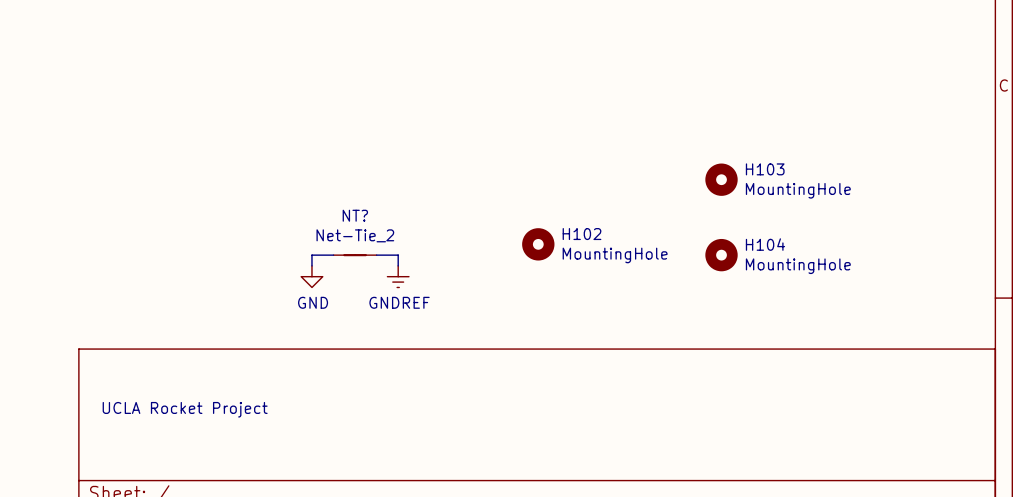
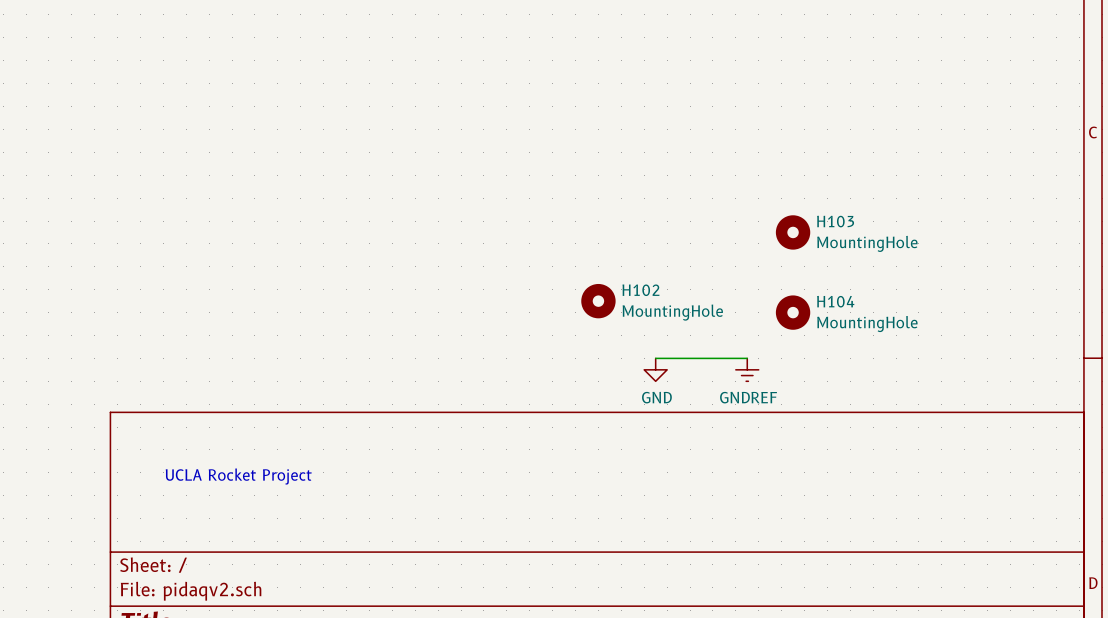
wire: (333, 255) (311, 255) (311, 265) -> none
NT?: Net-Tie_2 (355, 255) -> none
wire: (376, 255) (398, 255) (398, 265) -> none
power symbol: GND (311, 276) -> none
power symbol: GNDREF (398, 276) -> none
wire: none -> (655, 358) (747, 358)
power symbol: none -> GND (655, 369)
power symbol: none -> GNDREF (747, 369)

